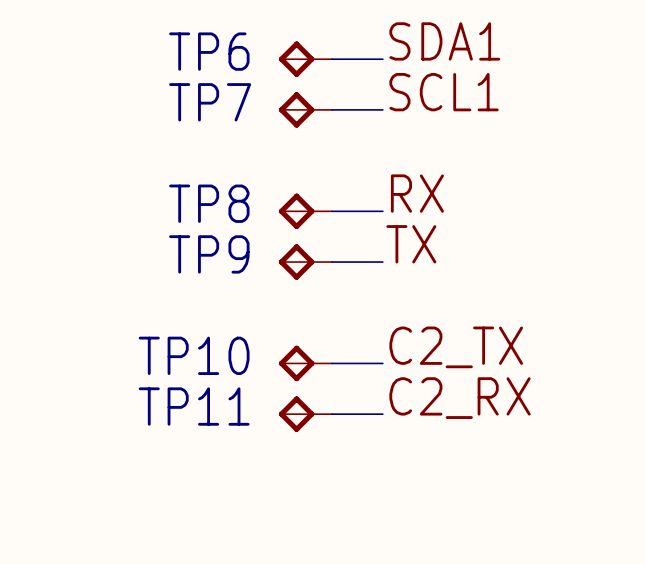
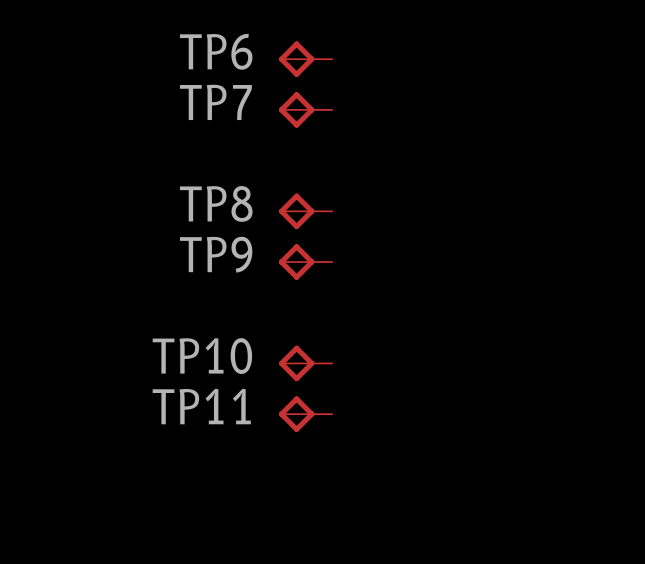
label: SDA1 (444, 41) -> none
wire: (332, 59) (382, 59) -> none
label: SCL1 (444, 92) -> none
wire: (332, 109) (382, 109) -> none
label: RX (417, 193) -> none
wire: (332, 211) (382, 211) -> none
label: TX (411, 244) -> none
wire: (332, 262) (382, 262) -> none
label: C2_TX (456, 347) -> none
wire: (332, 363) (382, 363) -> none
label: C2_RX (460, 398) -> none
wire: (332, 414) (382, 414) -> none

